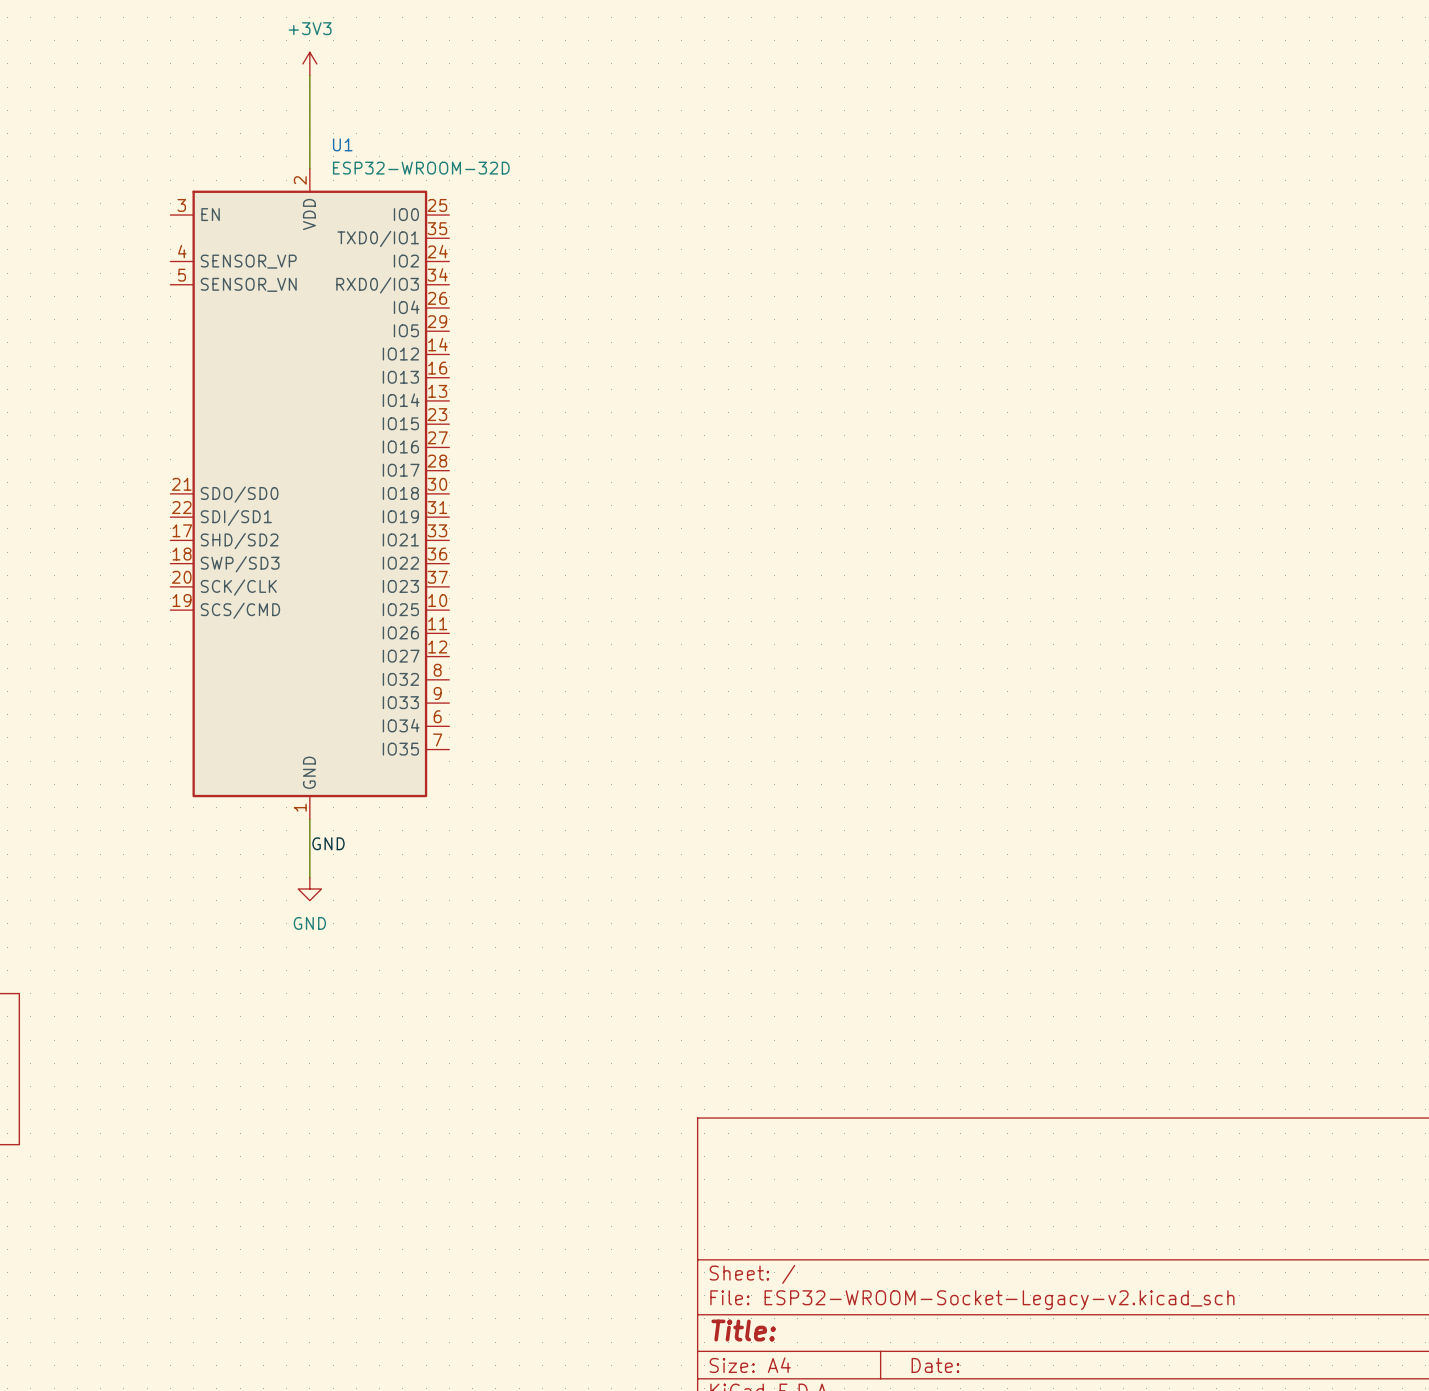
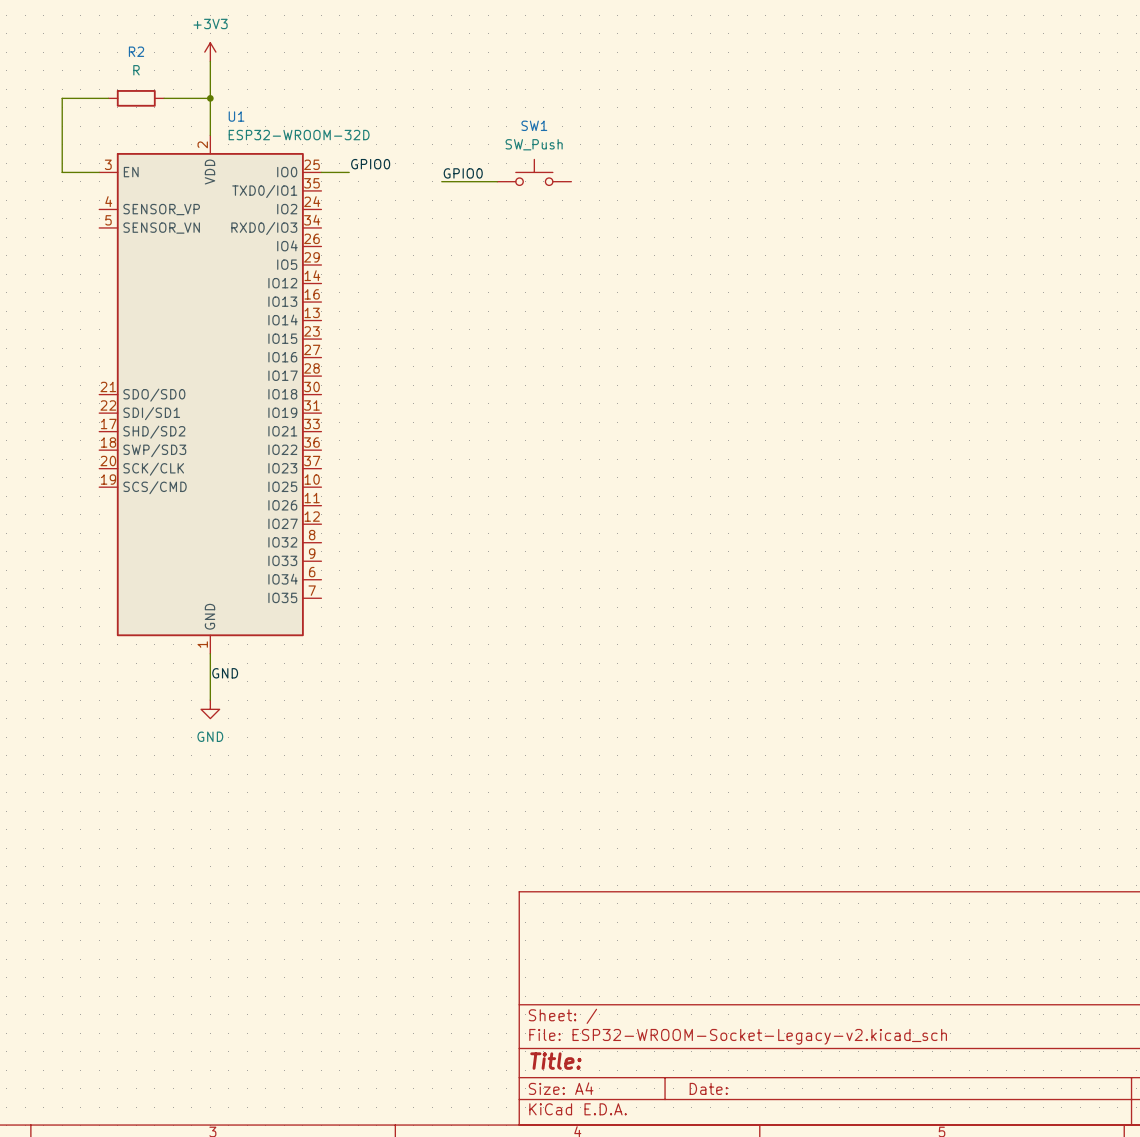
wire: none -> (108, 98) (62, 98) (62, 172) (99, 172)
R2: none -> R (136, 98)
wire: none -> (164, 98) (210, 98)
junction: none -> (210, 98)
label: none -> GPIO0 (370, 164)
wire: none -> (321, 172) (349, 172)
SW1: none -> SW_Push (534, 172)
label: none -> GPIO0 (463, 173)
wire: none -> (441, 181) (497, 181)

